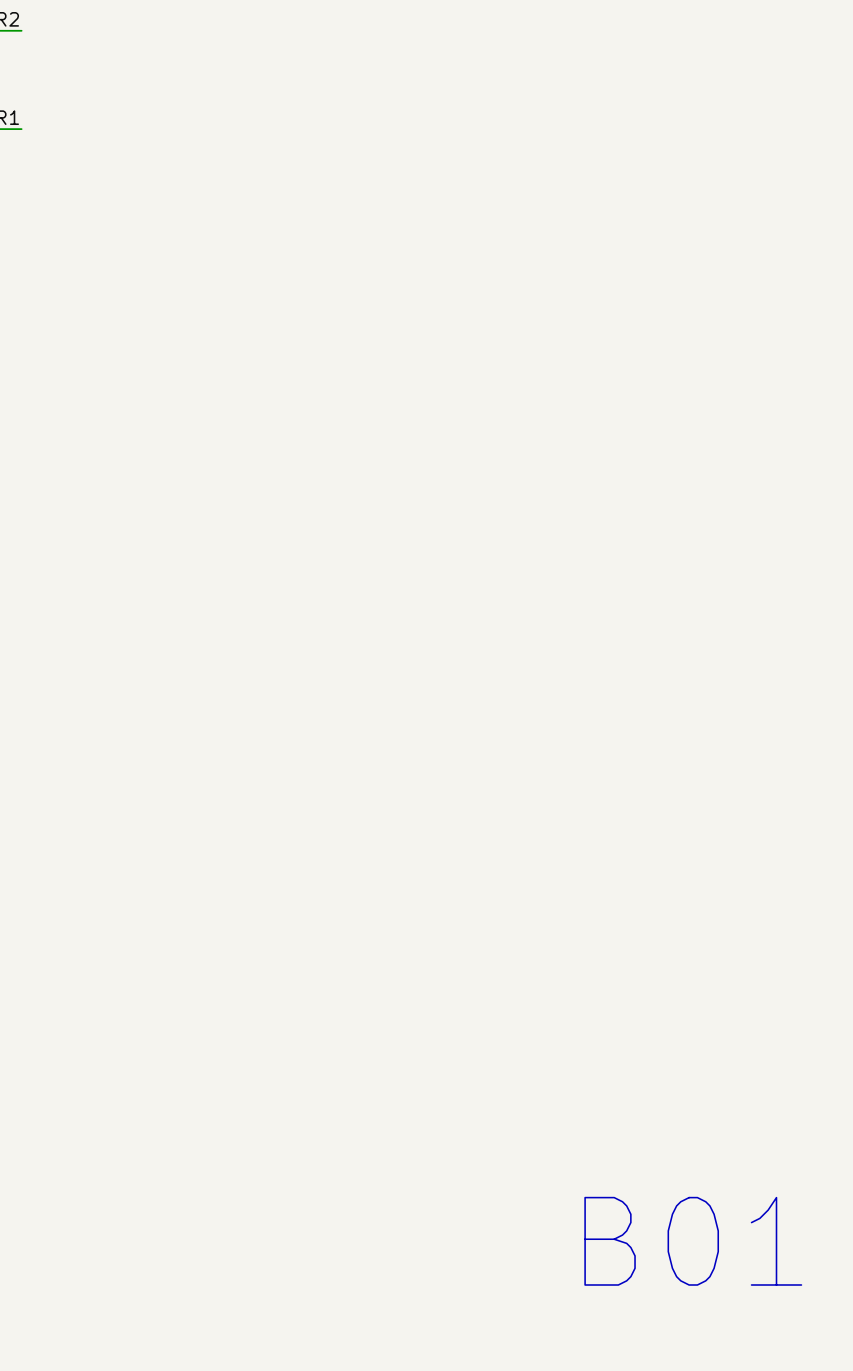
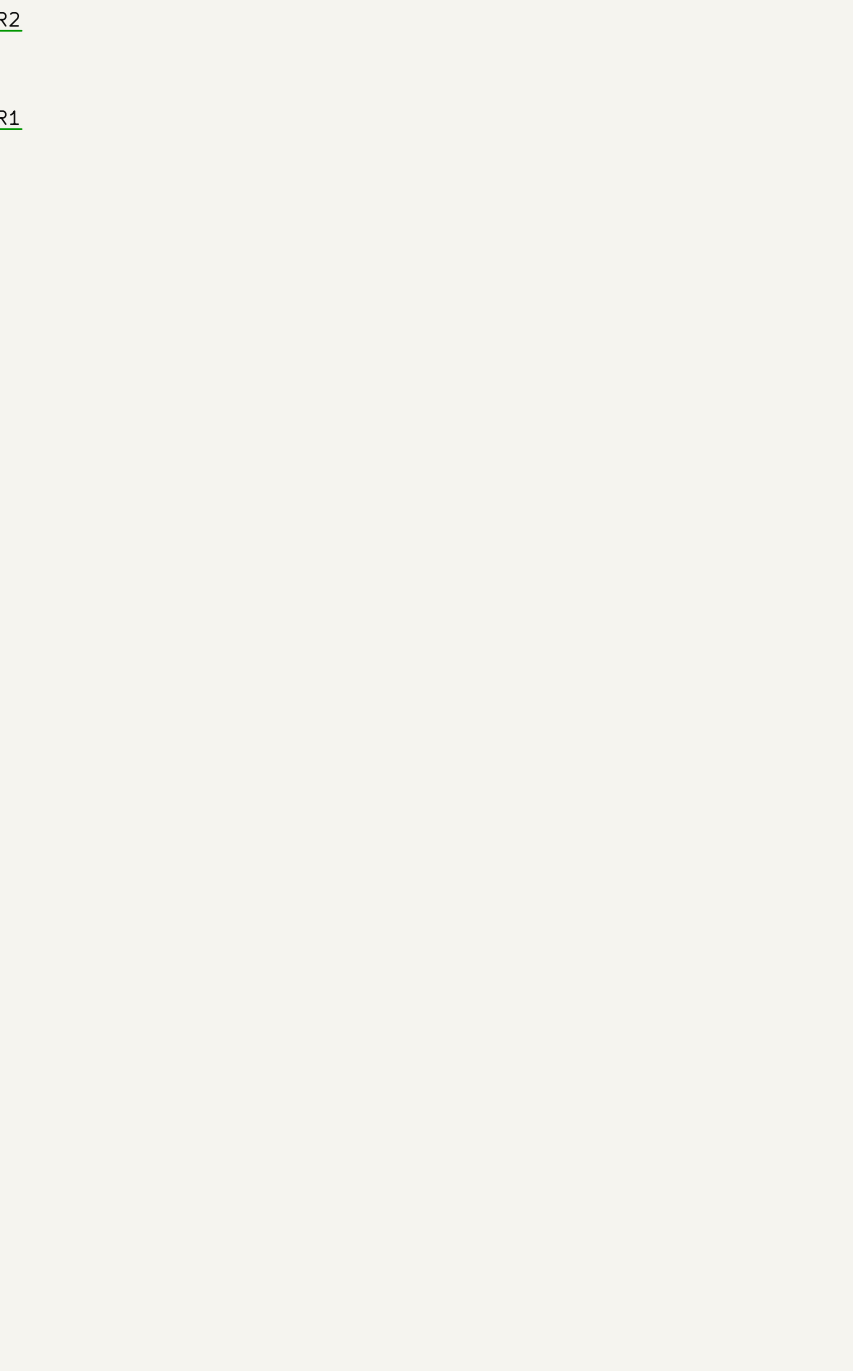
text: B01 (693, 1241) -> none

